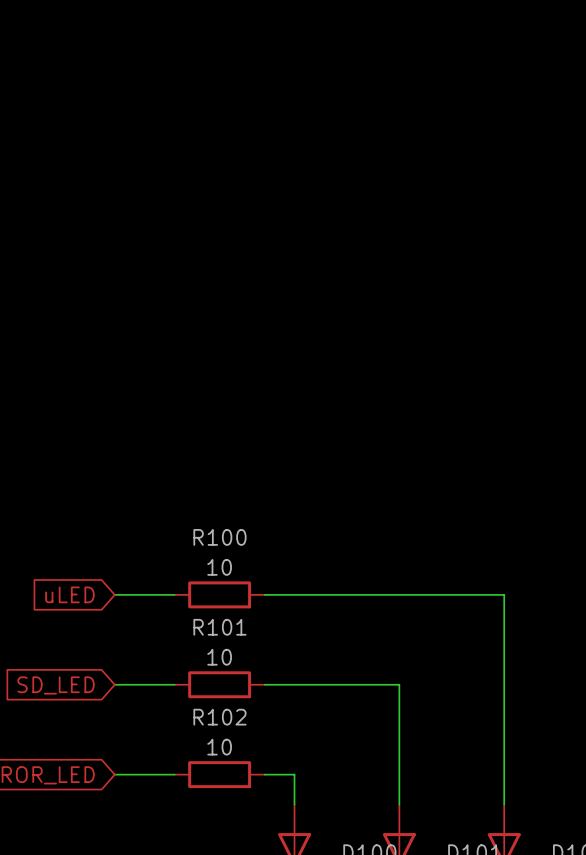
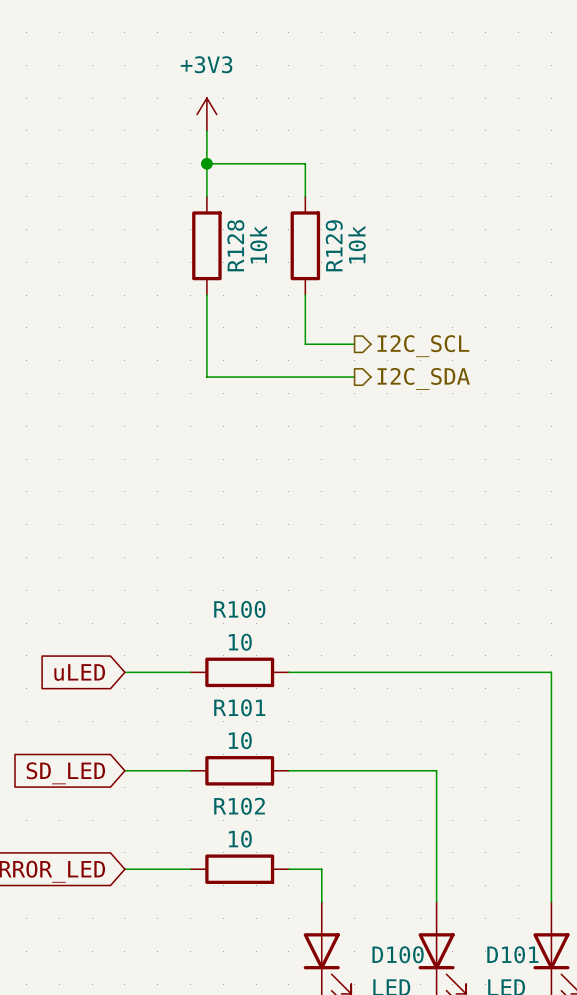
power symbol: none -> +3V3 (206, 114)
wire: none -> (206, 130) (206, 196)
wire: none -> (206, 163) (305, 163) (305, 196)
junction: none -> (206, 163)
R128: none -> 10k (206, 245)
R129: none -> 10k (305, 245)
wire: none -> (206, 295) (206, 377) (354, 377)
wire: none -> (305, 295) (305, 344) (354, 344)
hierarchical label: none -> I2C_SCL (423, 346)
hierarchical label: none -> I2C_SDA (423, 378)

